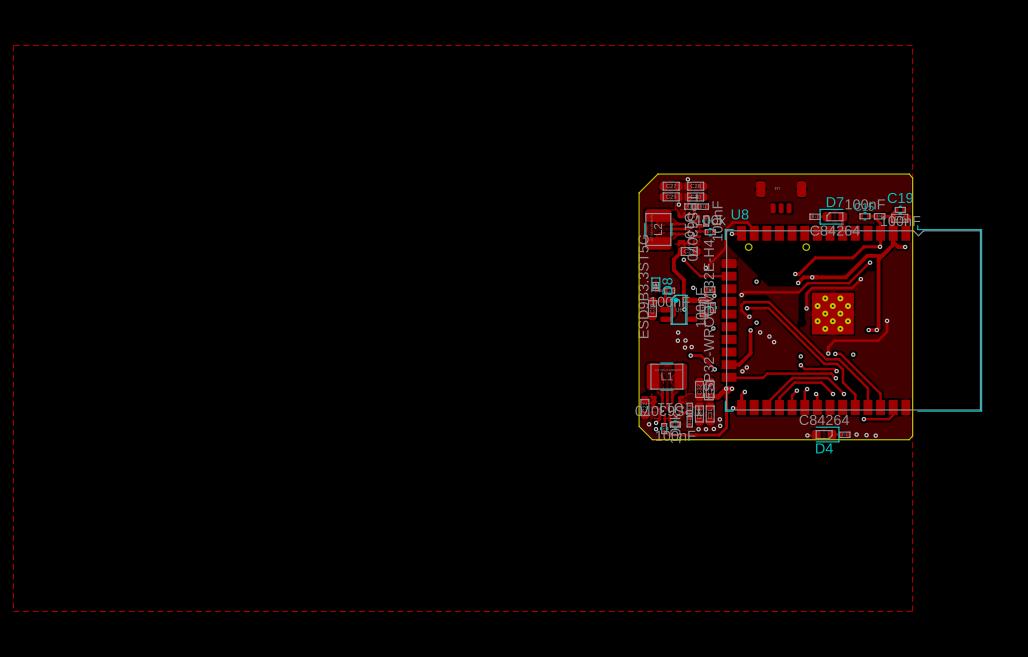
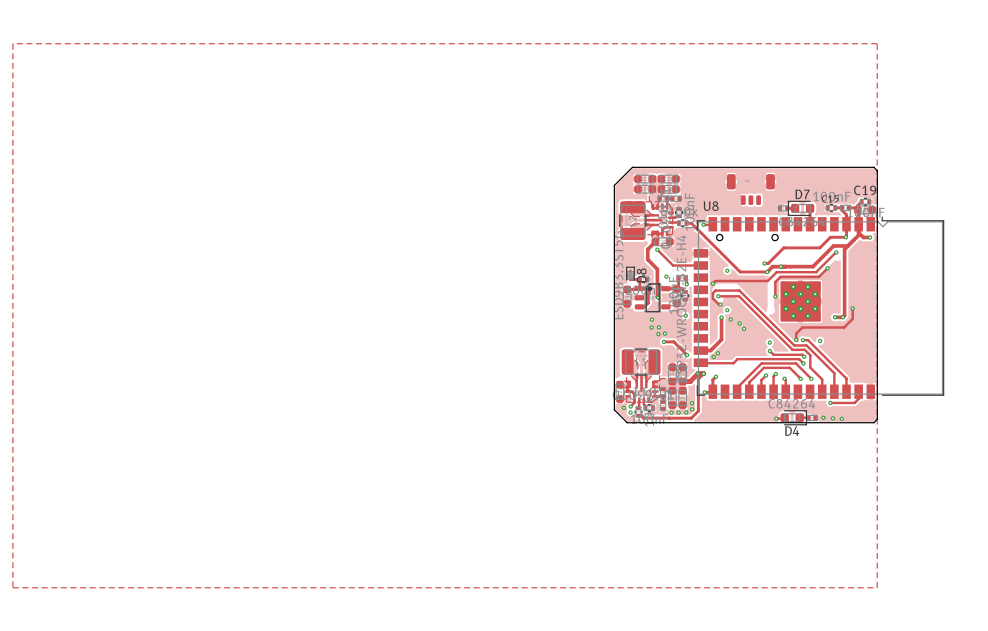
via: (687, 179) -> none
via: (678, 204) -> none
track: none -> (686, 223) (691, 223) (740, 272) (767, 272)
track: (754, 233) (754, 229) (747, 222) (732, 222) (725, 229) (725, 248) (705, 267) -> none
via: (705, 267) -> none

